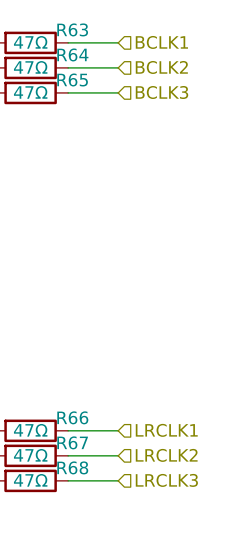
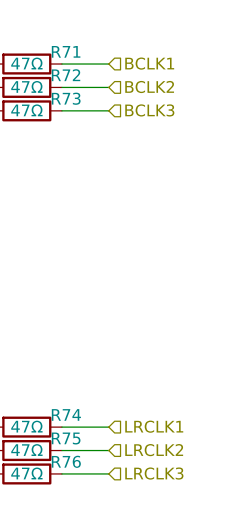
R63 name: R63 (72, 29) -> R71 (66, 51)
R64 name: R64 (72, 54) -> R72 (66, 75)
R65 name: R65 (72, 79) -> R73 (66, 98)
R66 name: R66 (72, 417) -> R74 (66, 414)
R67 name: R67 (72, 442) -> R75 (66, 438)
R68 name: R68 (72, 467) -> R76 (66, 461)

